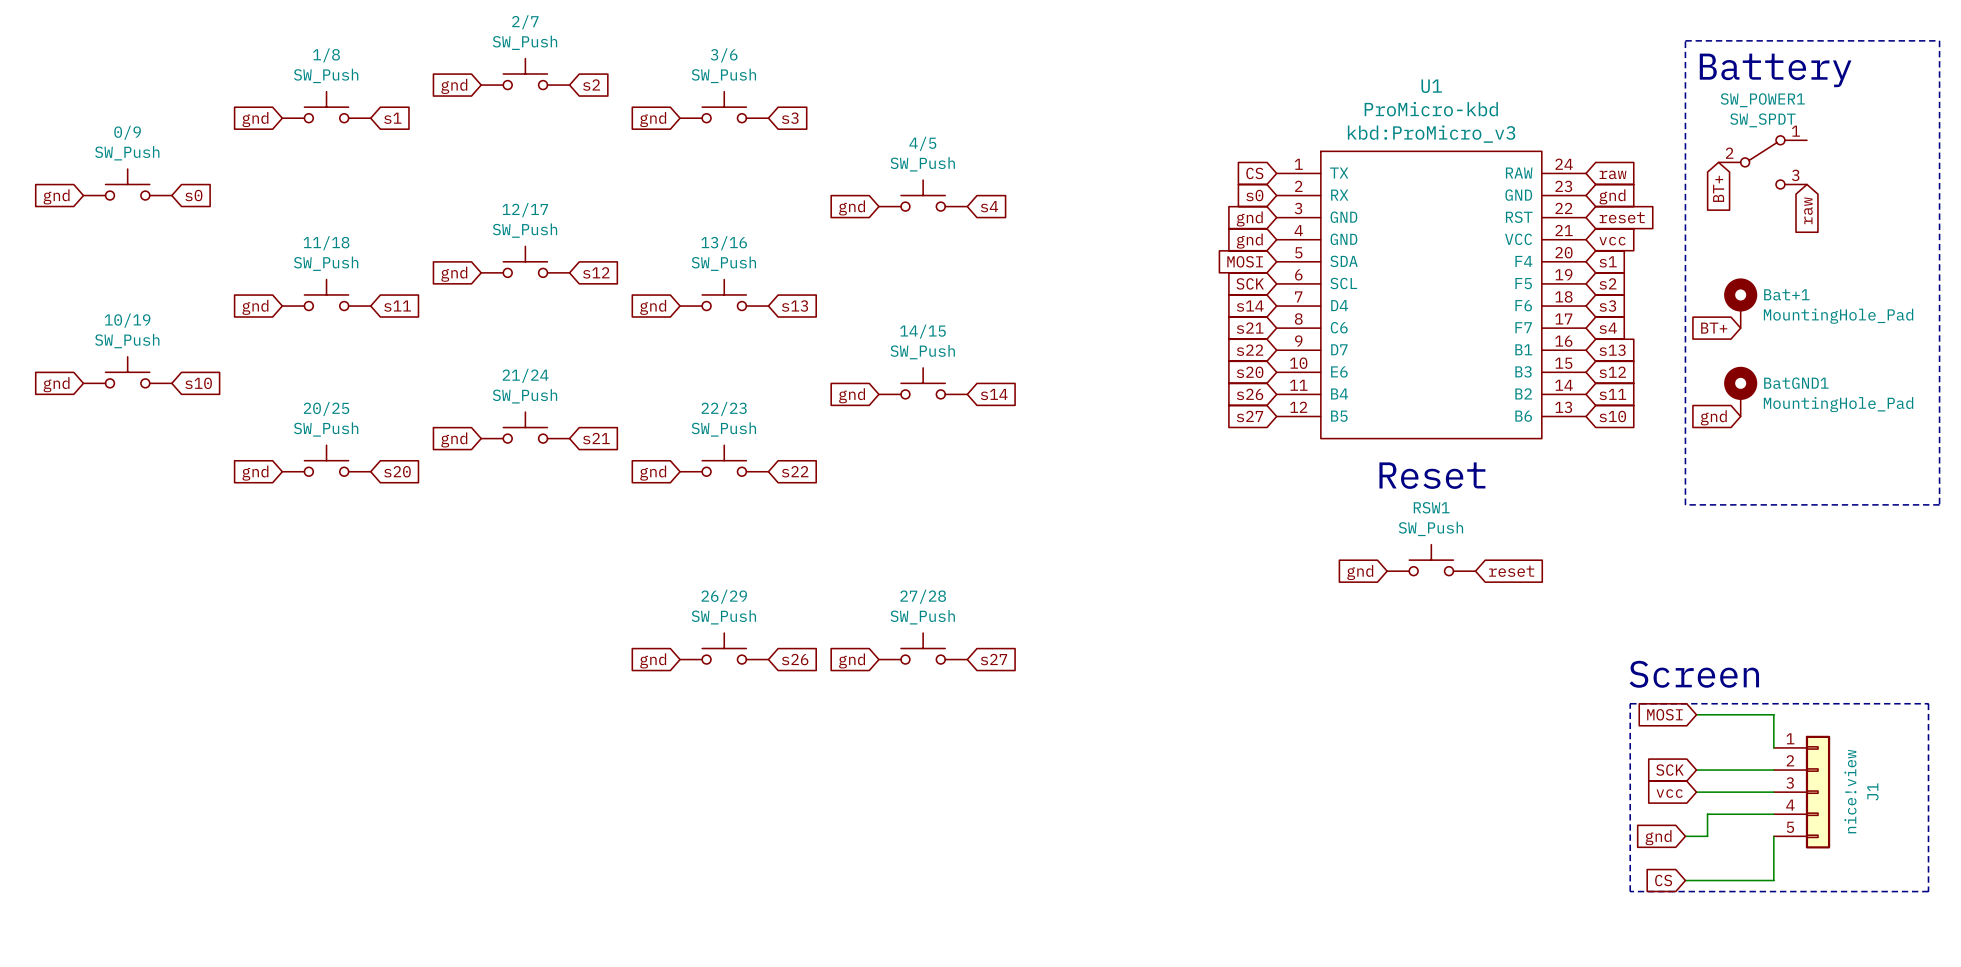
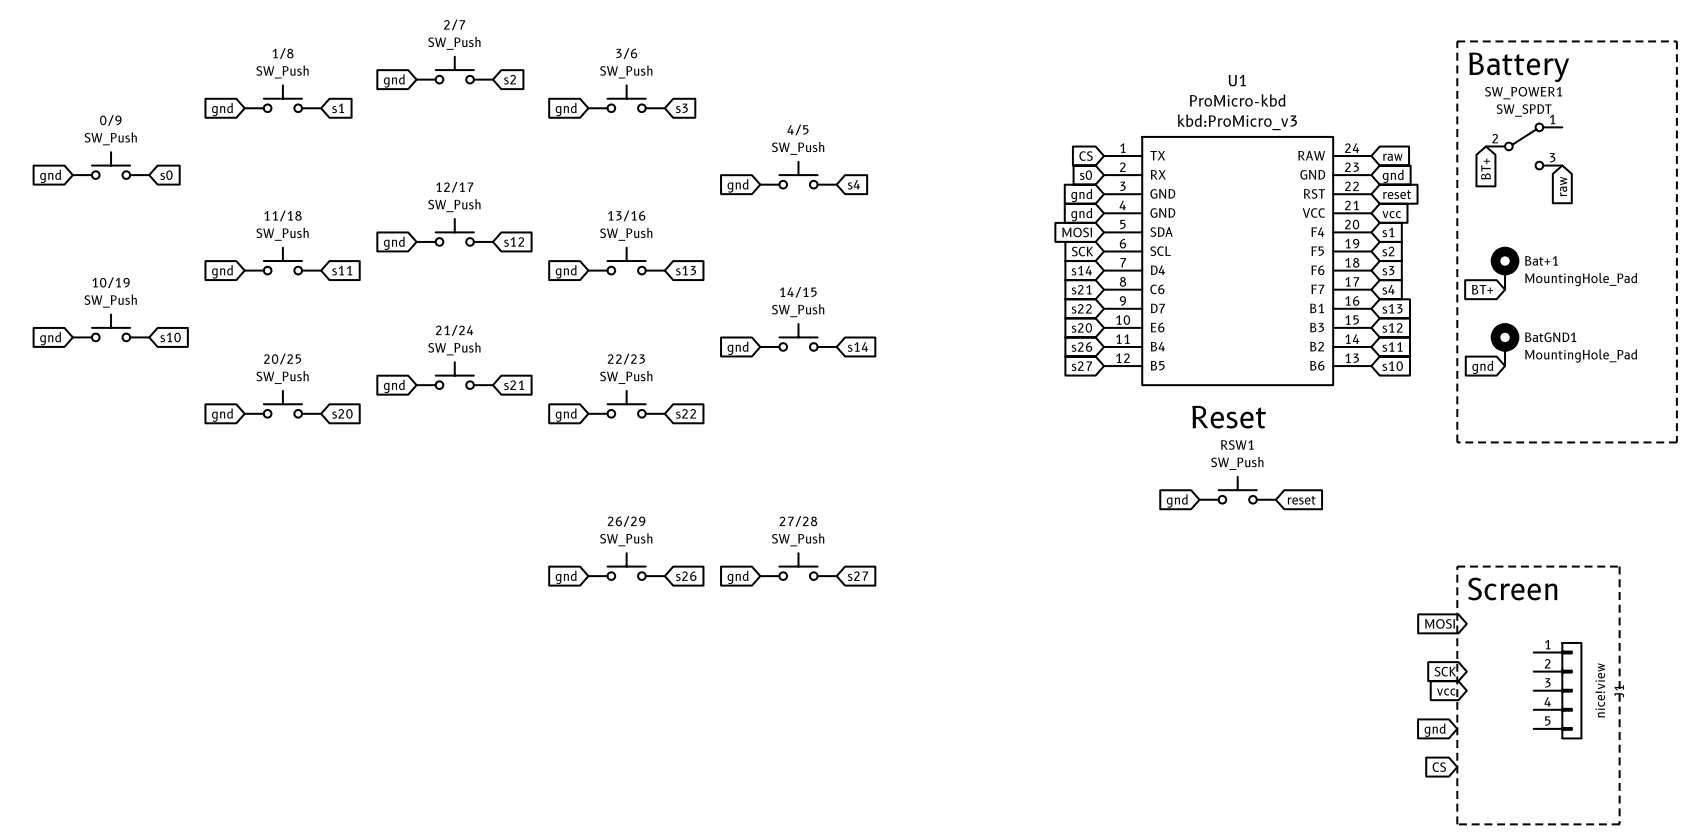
line: none -> (1457, 566) (1457, 824) (1619, 824) (1619, 566) (1457, 566)
text position: Screen (1694, 674) -> Screen (1512, 589)
line: (1630, 703) (1630, 891) (1928, 891) (1928, 703) (1630, 703) -> none
wire: (1696, 714) (1773, 714) (1773, 747) -> none
wire: (1696, 770) (1773, 770) -> none
wire: (1696, 792) (1773, 792) -> none
wire: (1773, 814) (1707, 814) (1707, 836) (1685, 836) -> none
wire: (1773, 836) (1773, 880) (1685, 880) -> none

